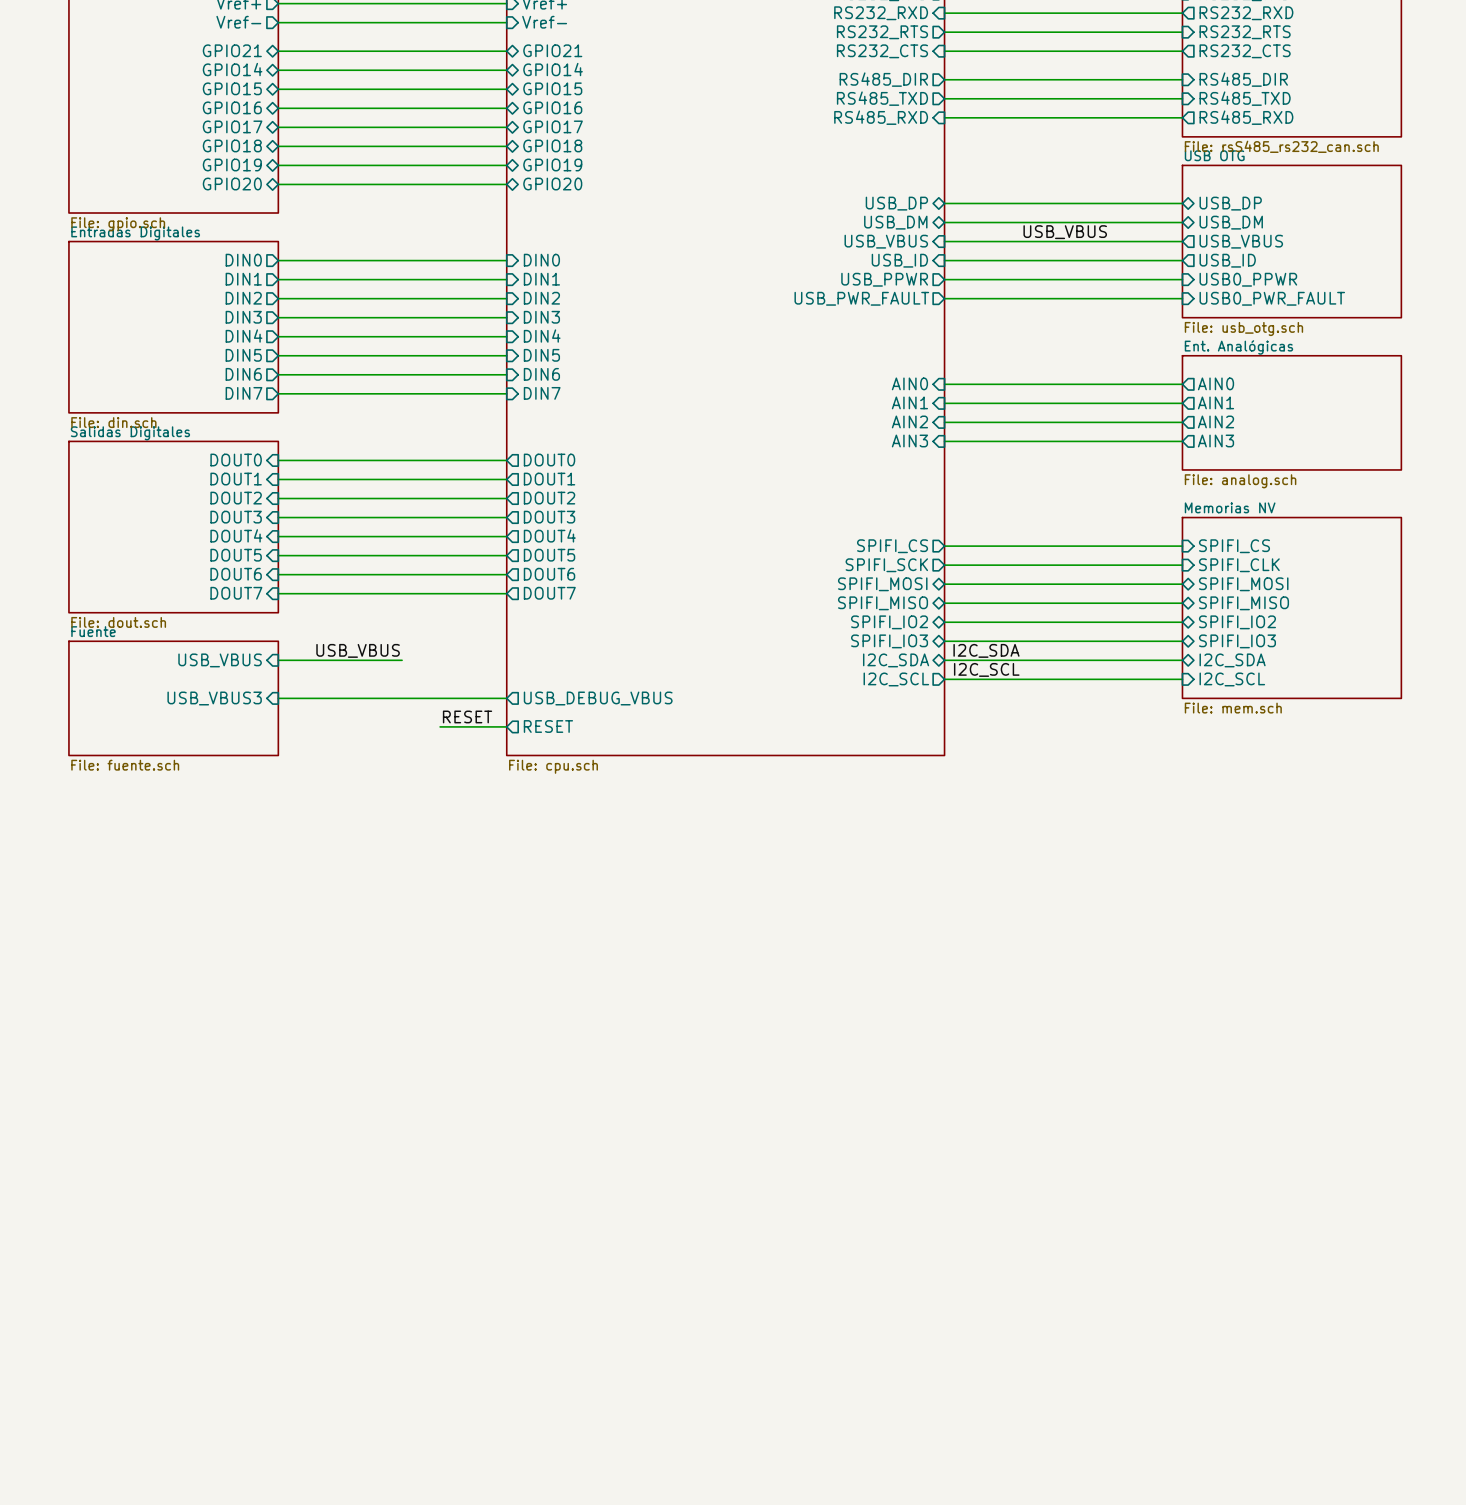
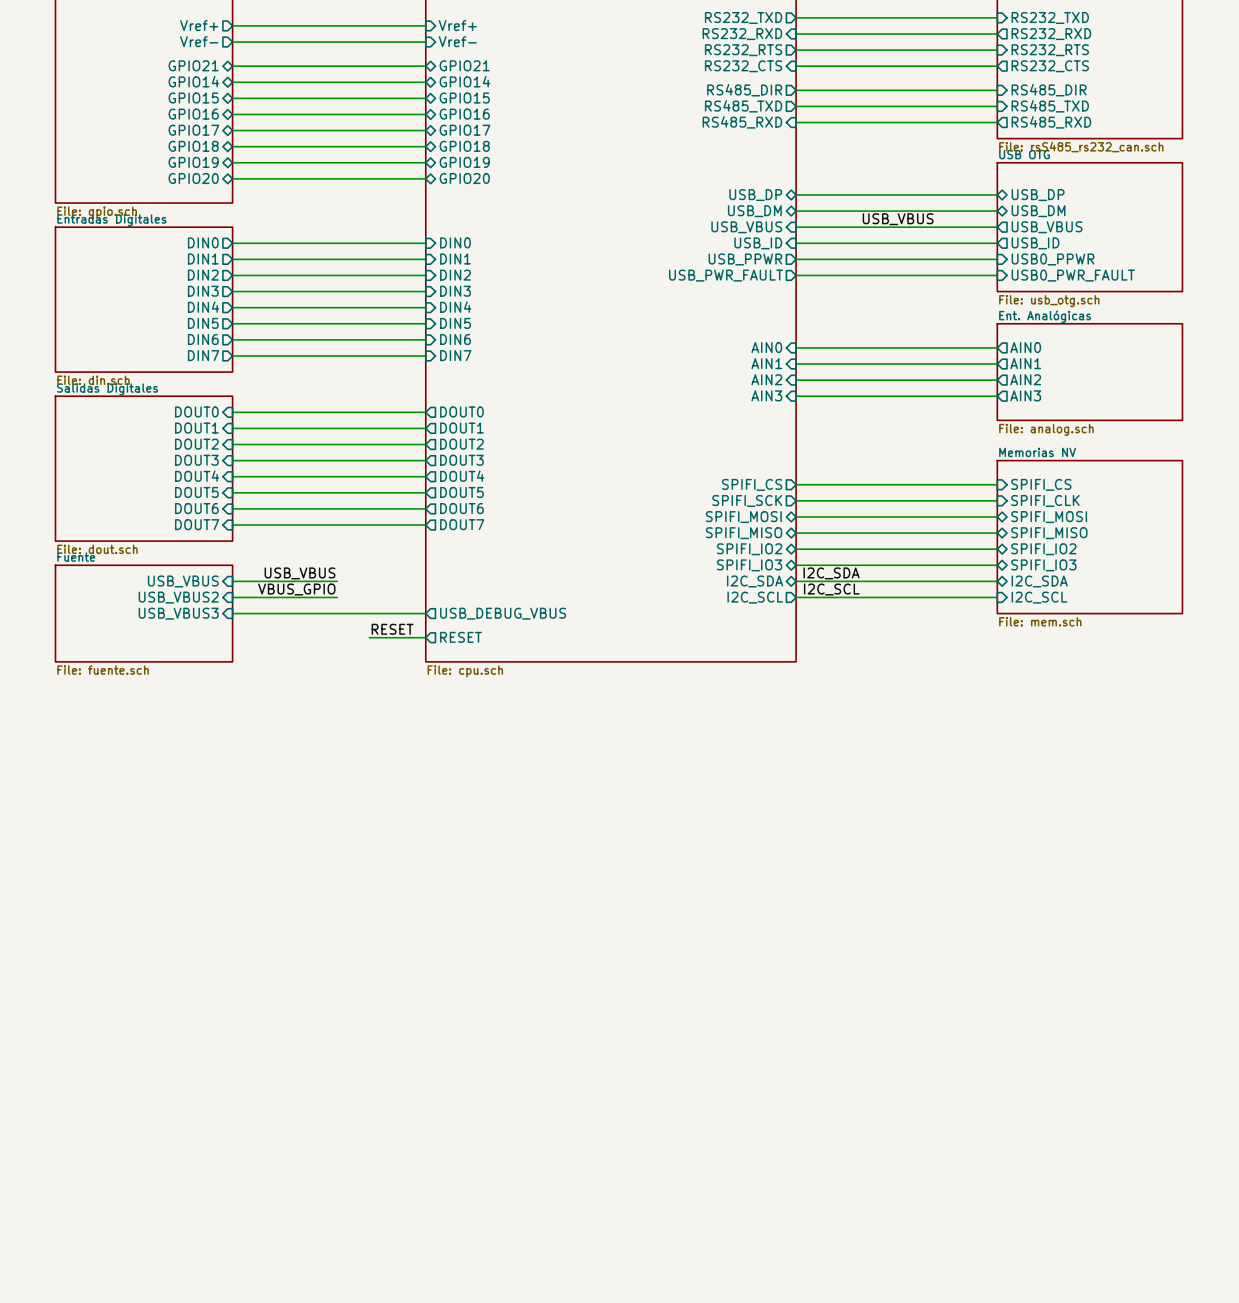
label: none -> VBUS_GPIO (296, 589)
sheet pin: none -> USB_VBUS2 (178, 597)
wire: none -> (232, 597) (337, 597)

